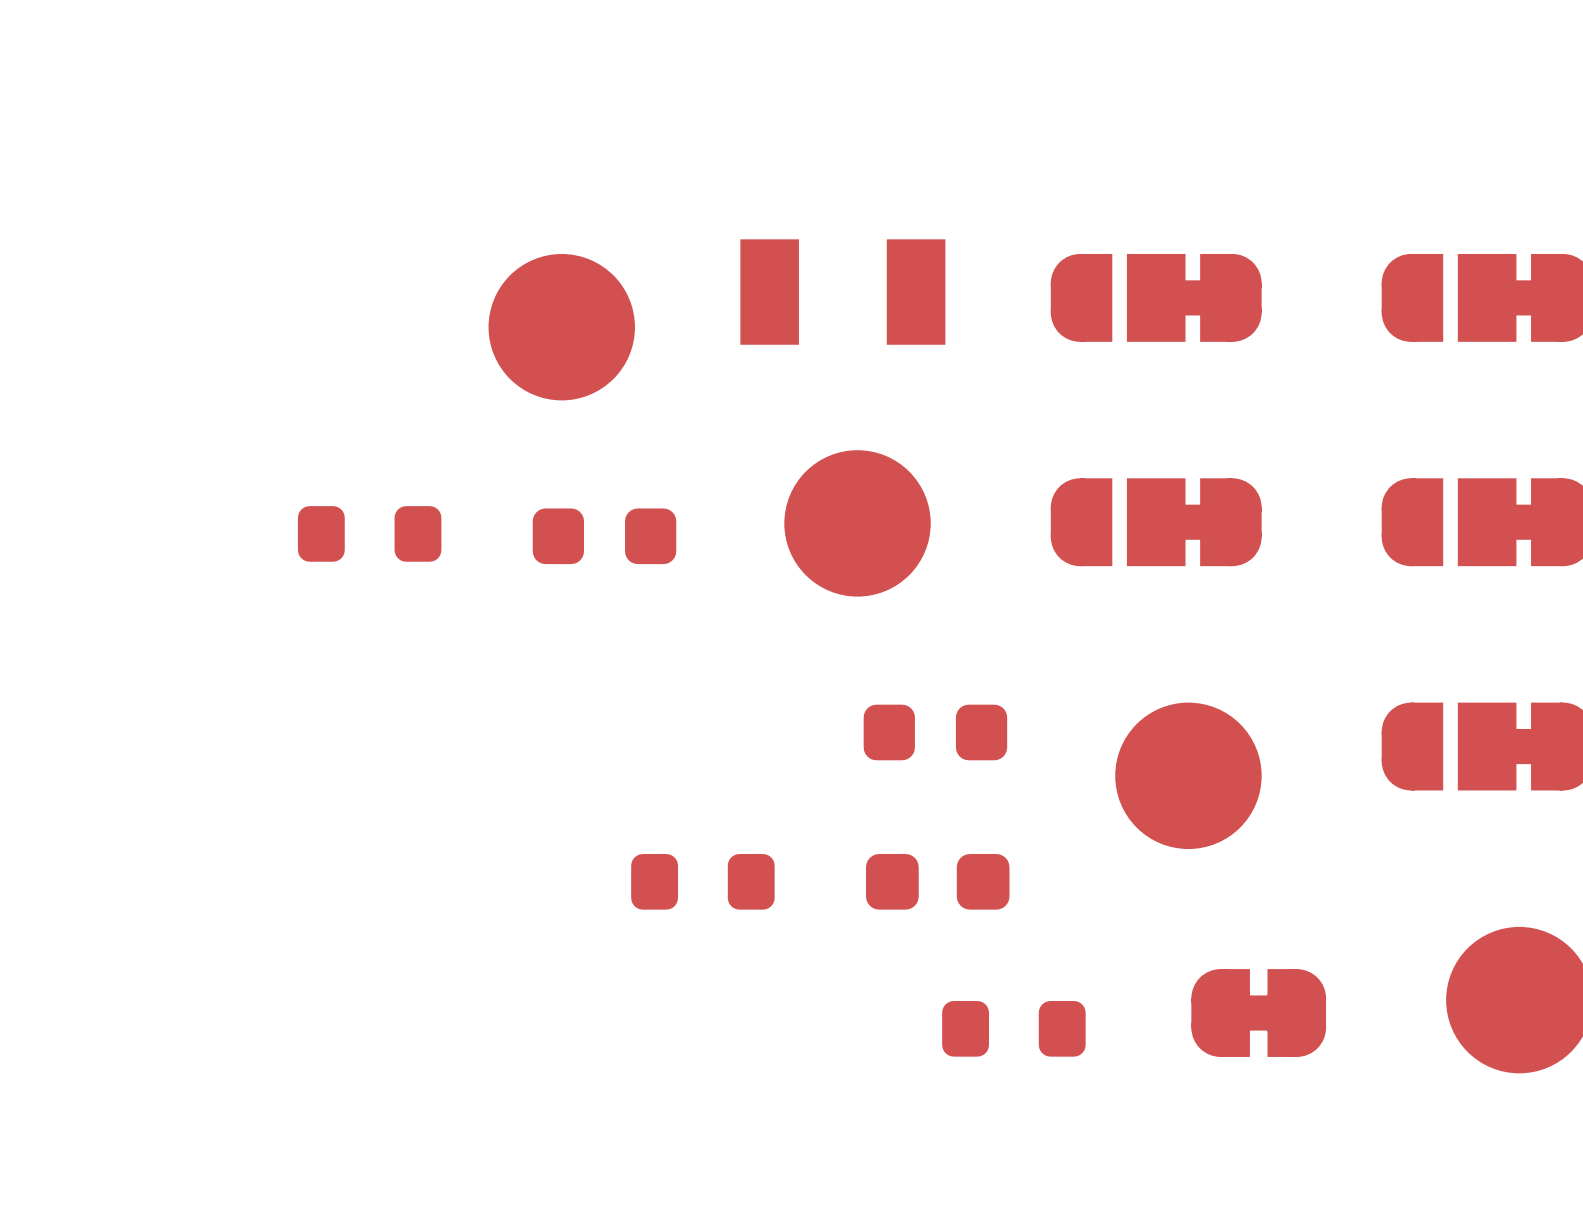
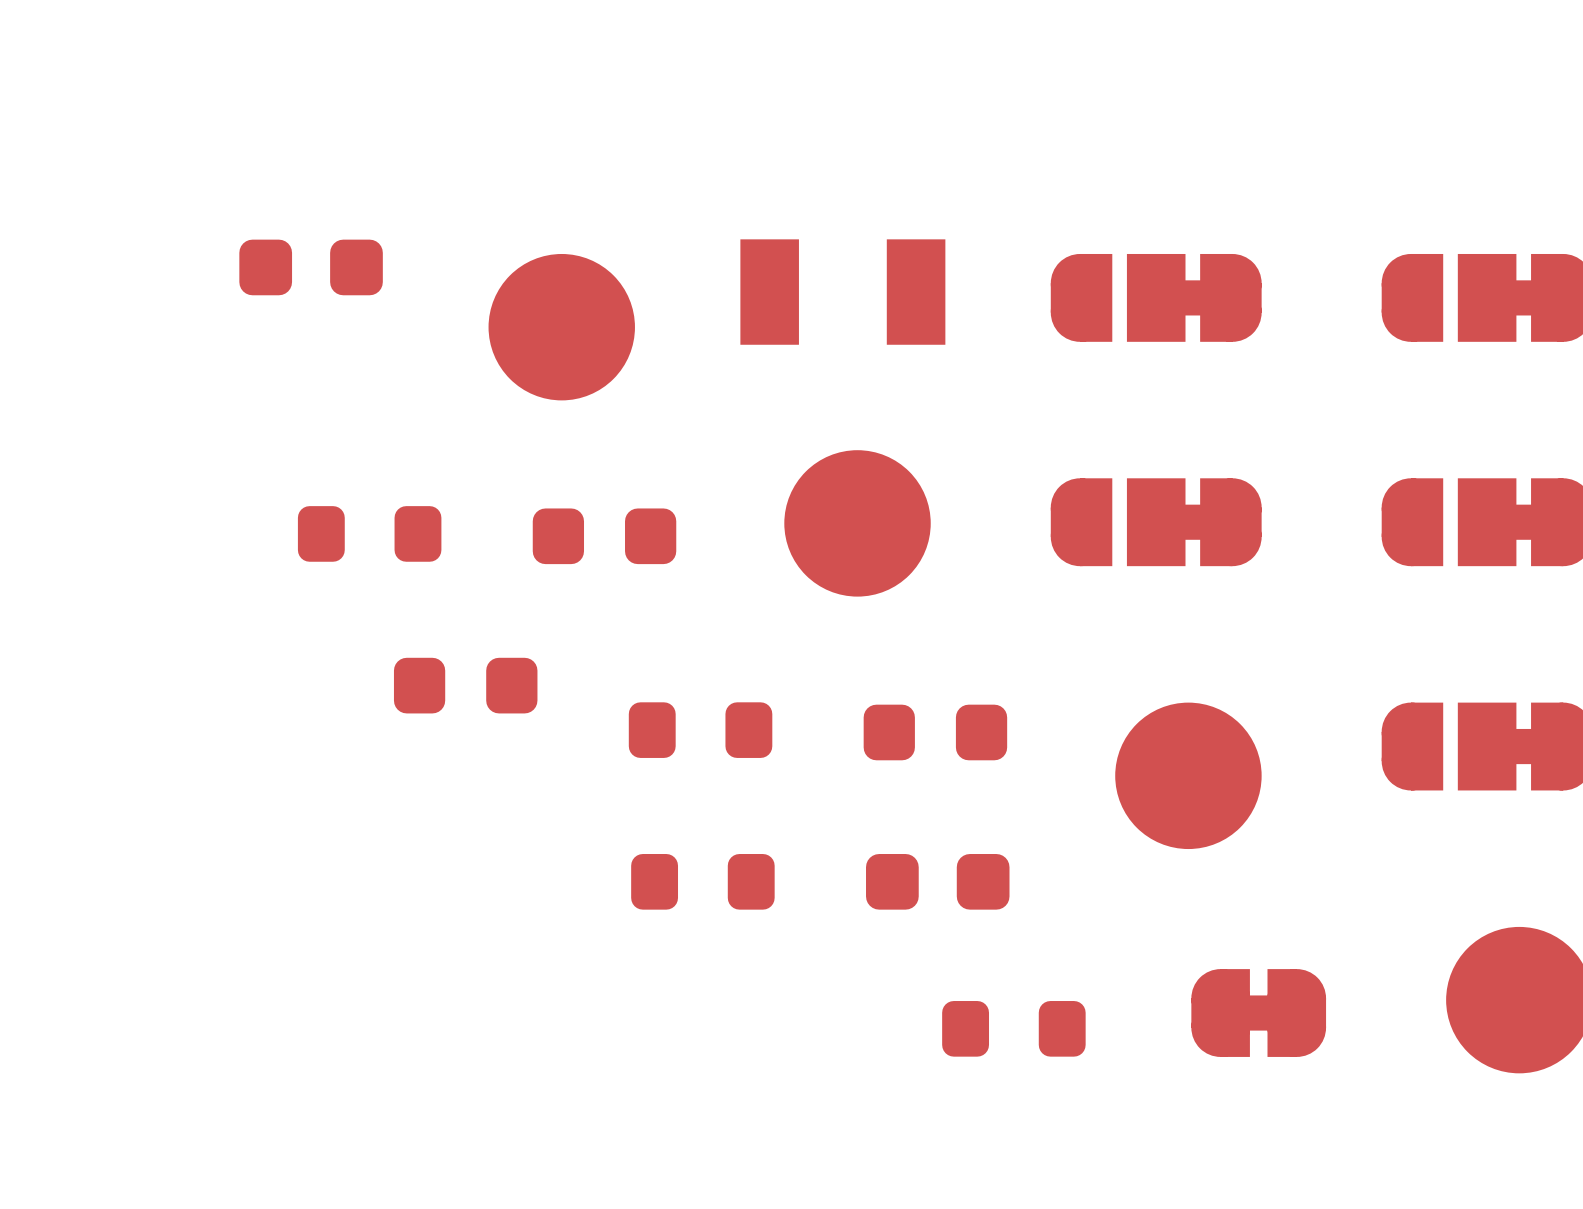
part: none -> (311, 267)
part: none -> (465, 685)
part: none -> (700, 730)

